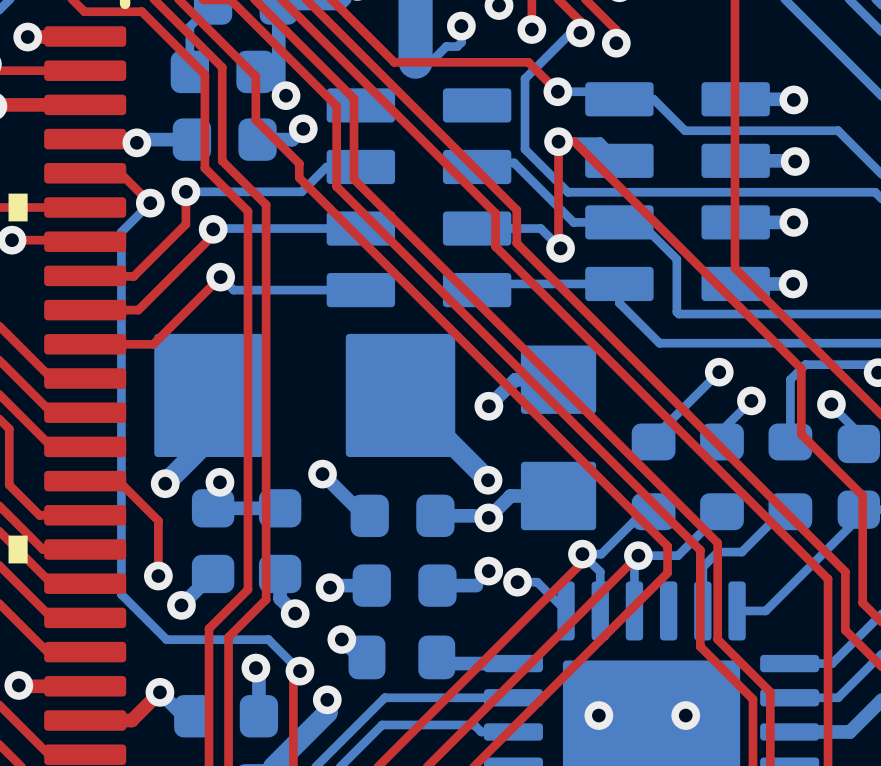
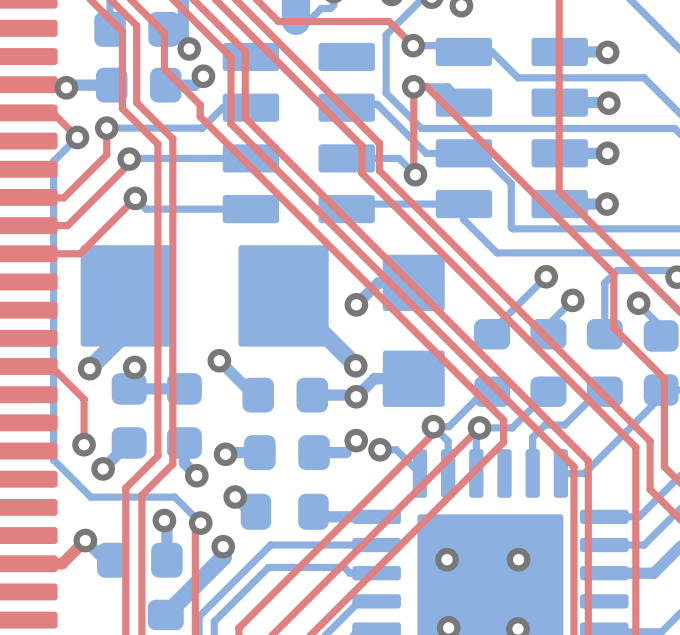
top track: (717, 542) (717, 639) (770, 692) -> (544, 417) (588, 460) (588, 540)
top track: (700, 550) (700, 646) (752, 699) -> (530, 423) (573, 466) (573, 546)

